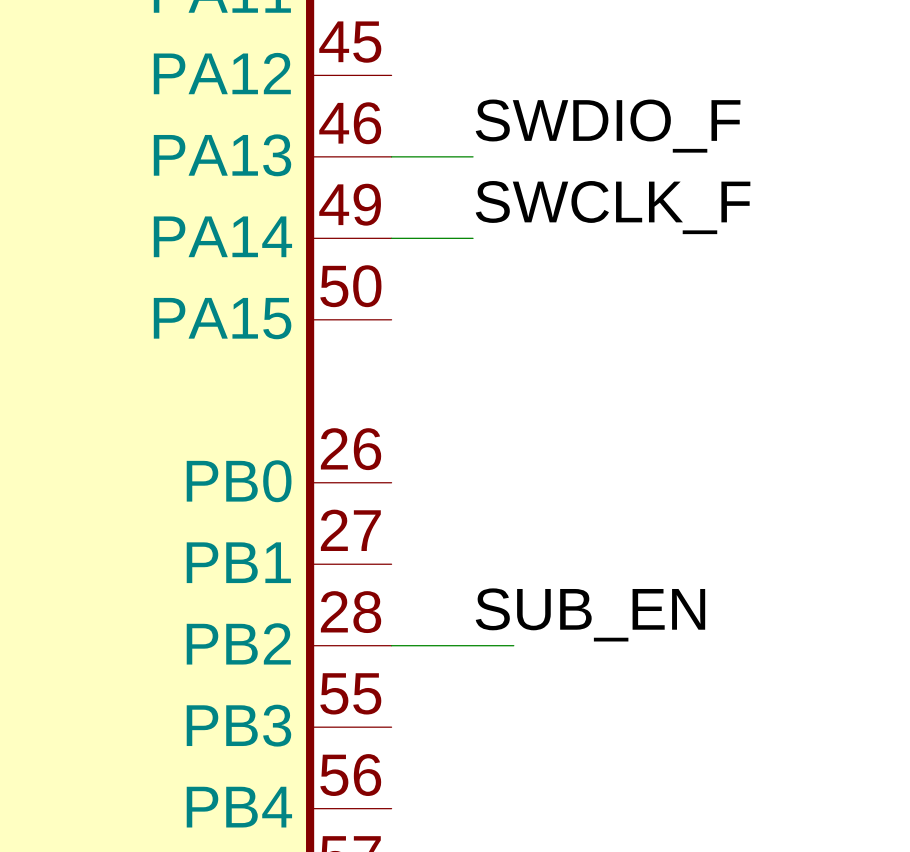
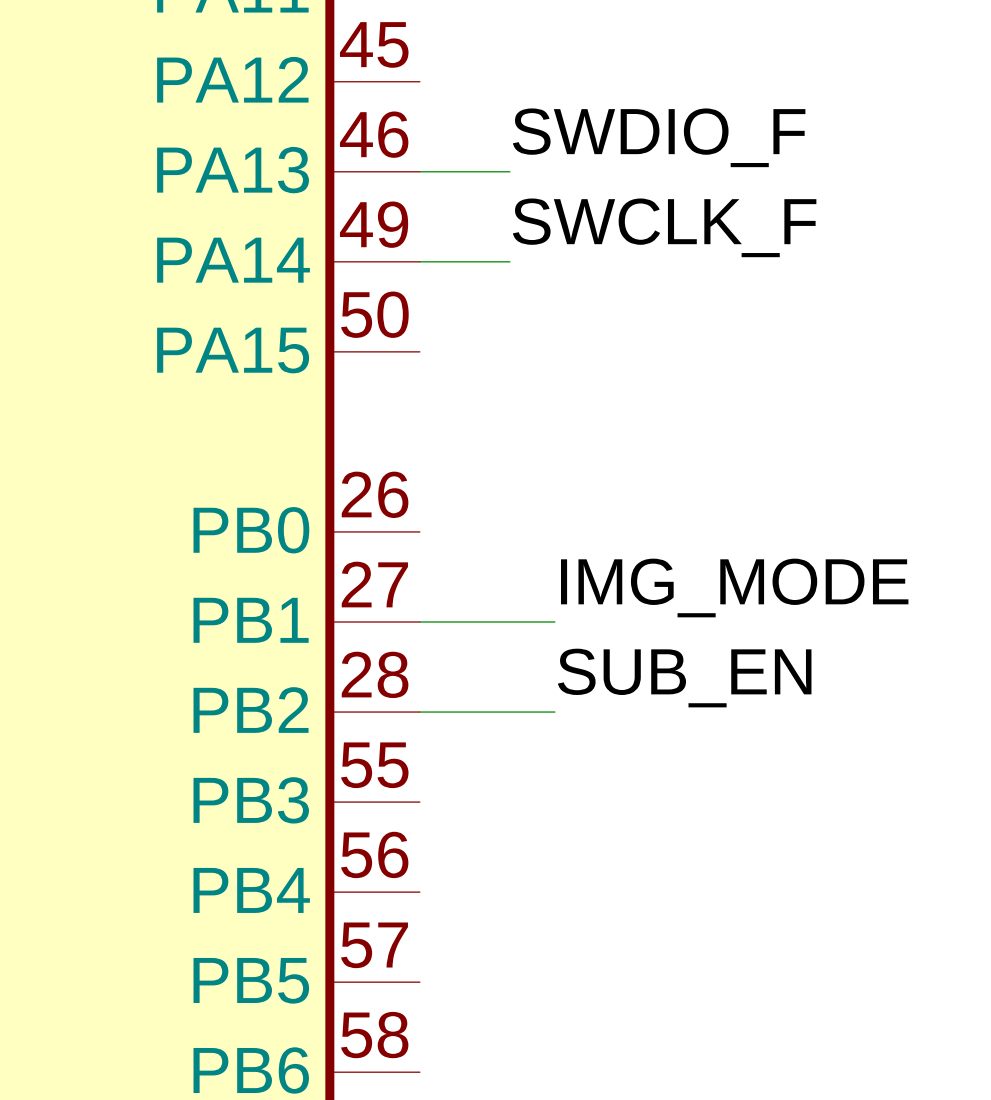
label: none -> IMG_MODE (734, 587)
wire: none -> (419, 621) (554, 621)
label position: SUB_EN (590, 614) -> SUB_EN (684, 678)

